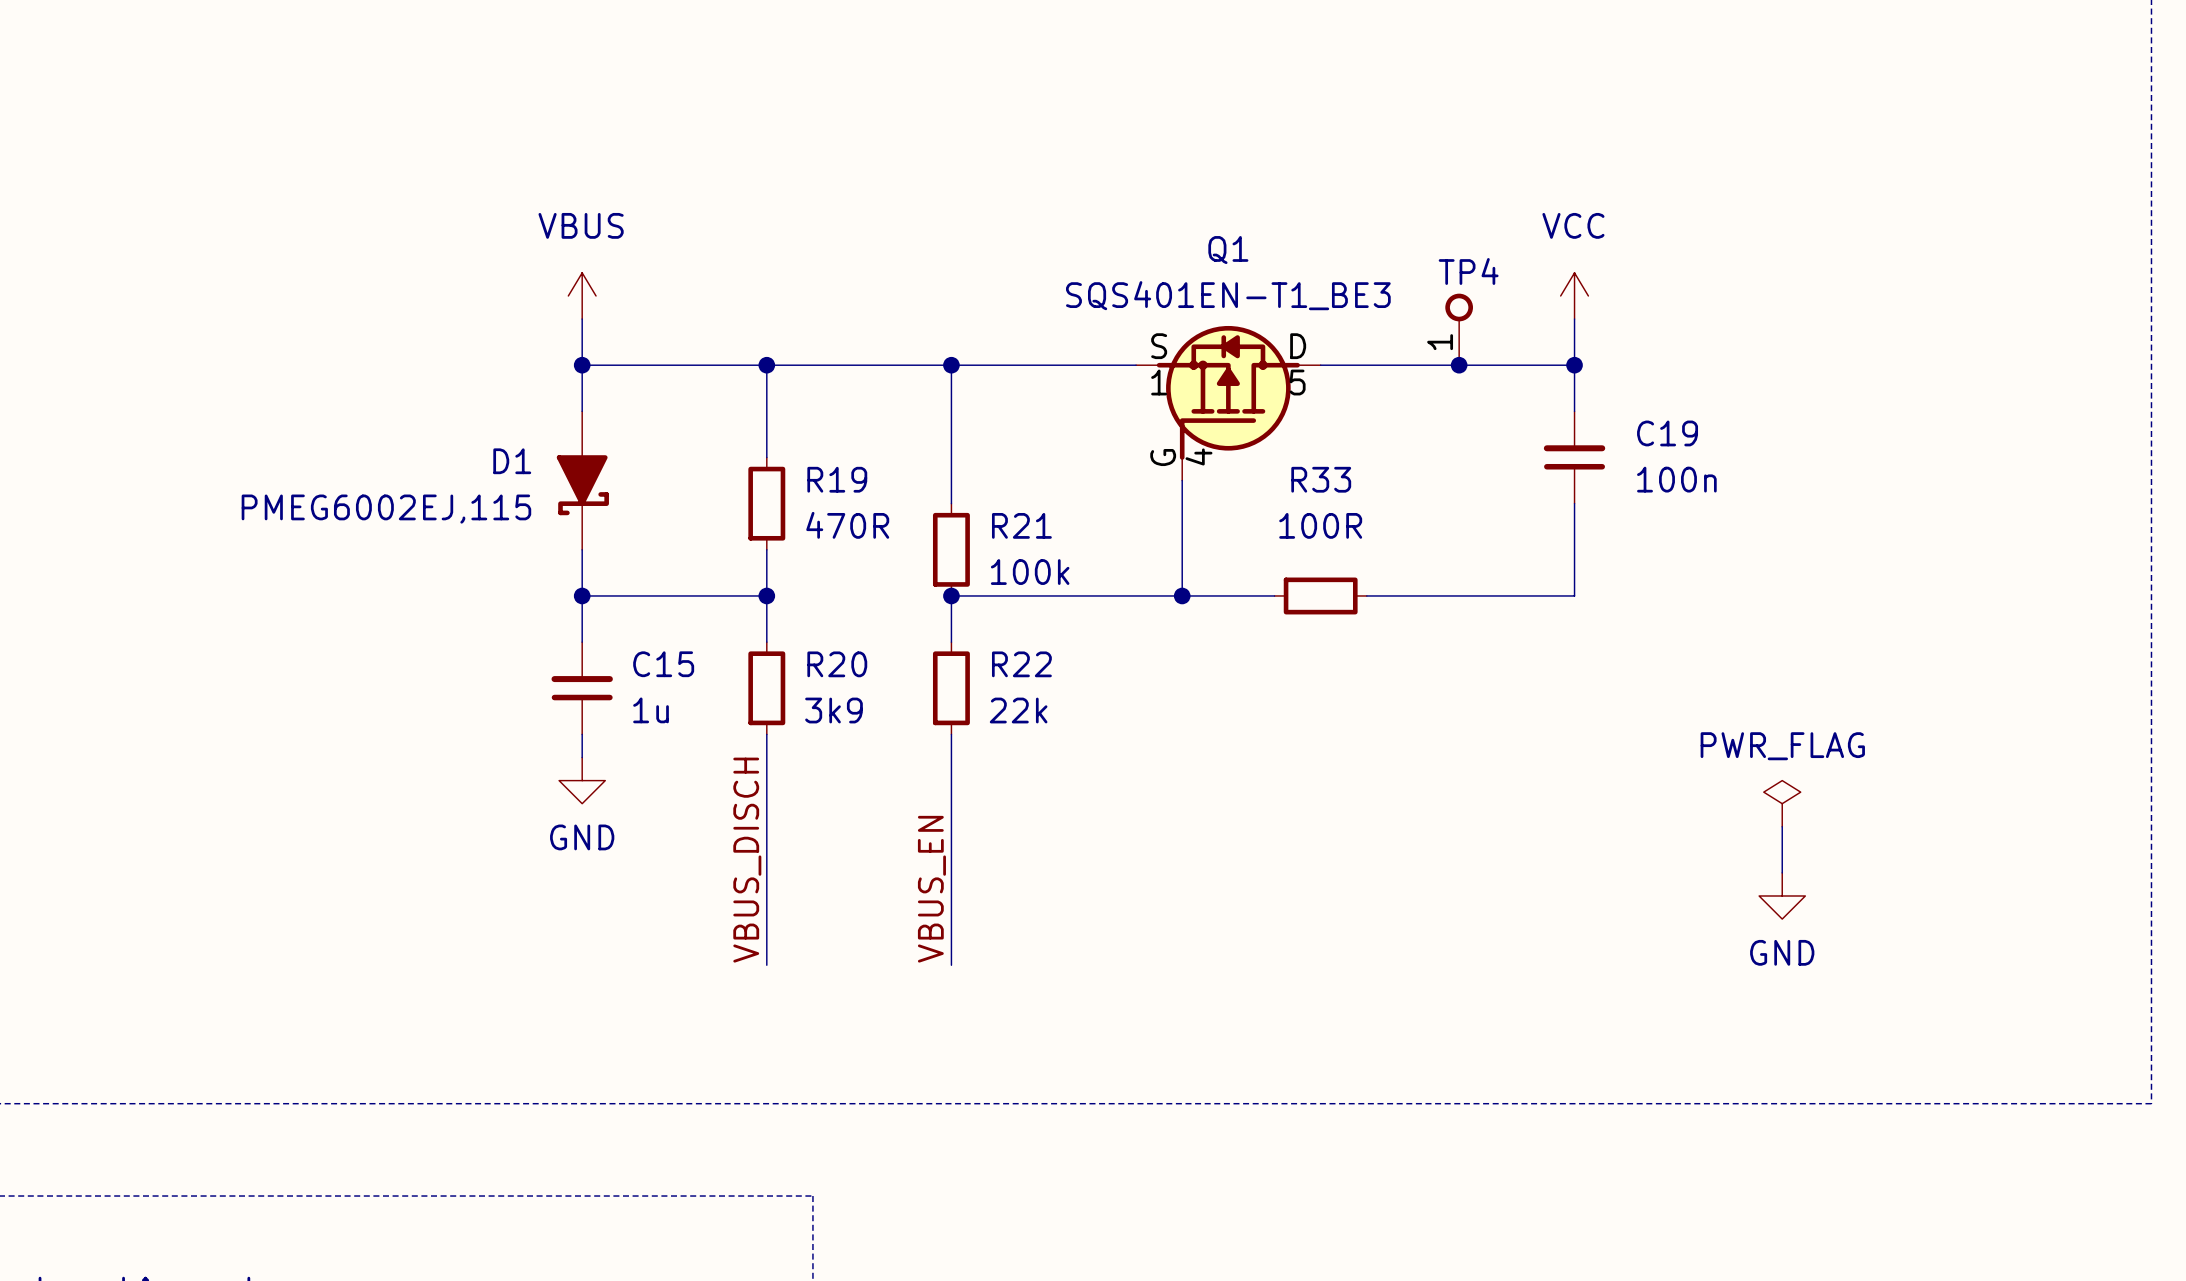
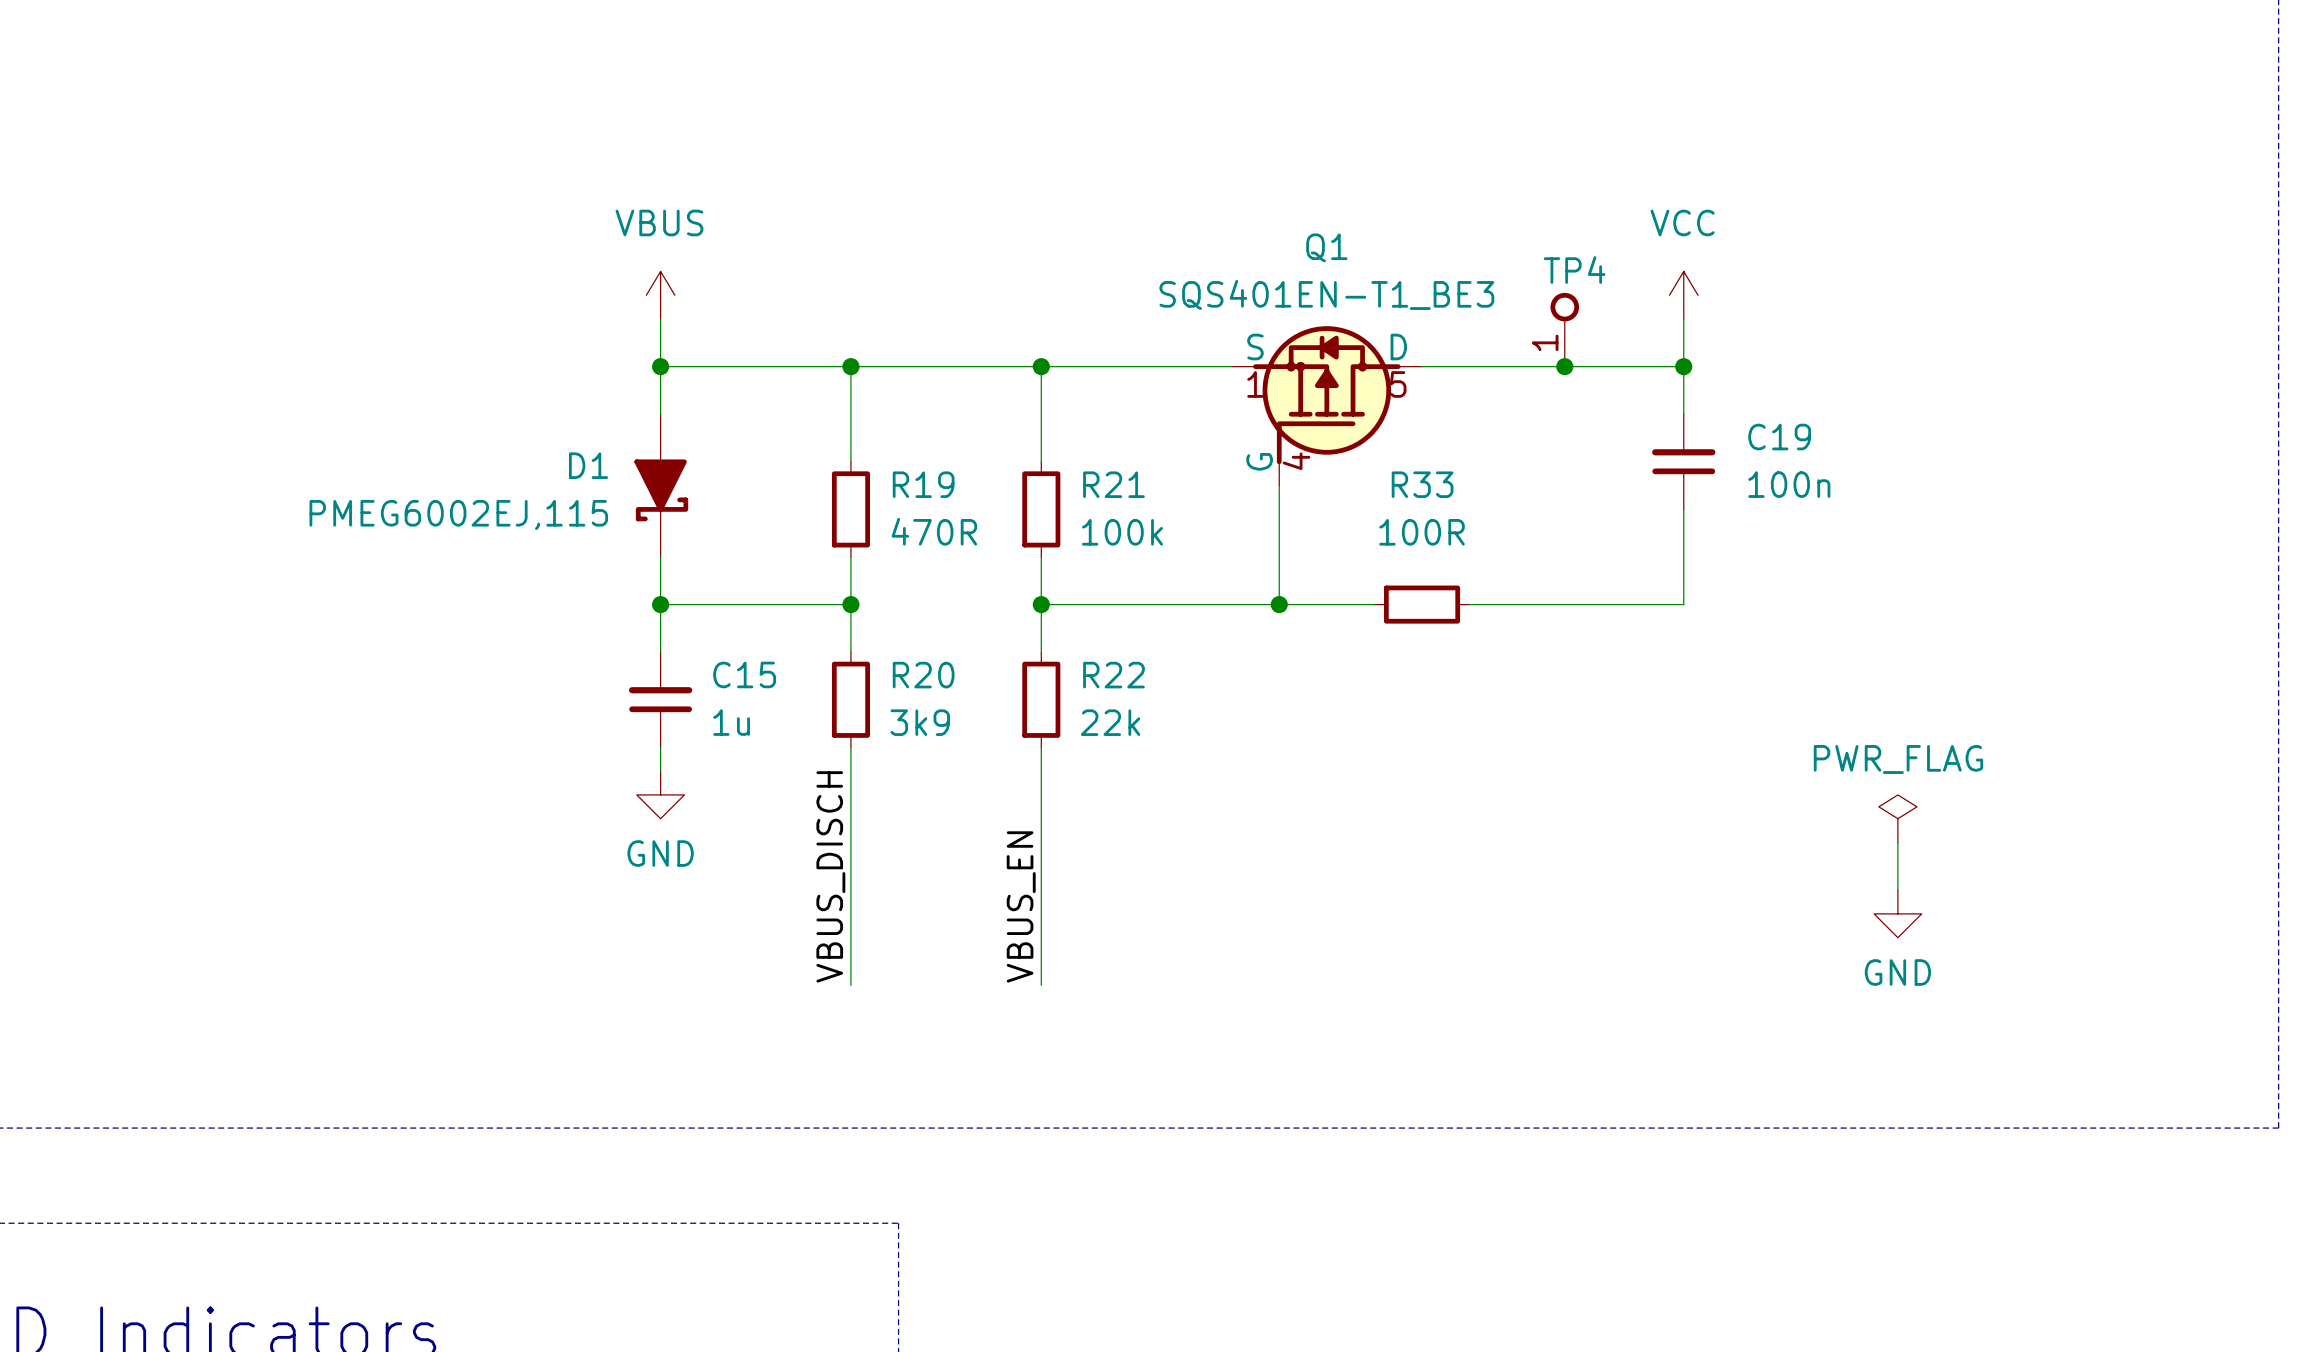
wire: (951, 457) (951, 503) -> (1041, 556) (1041, 604)
R21 position: (951, 549) -> (1041, 509)

